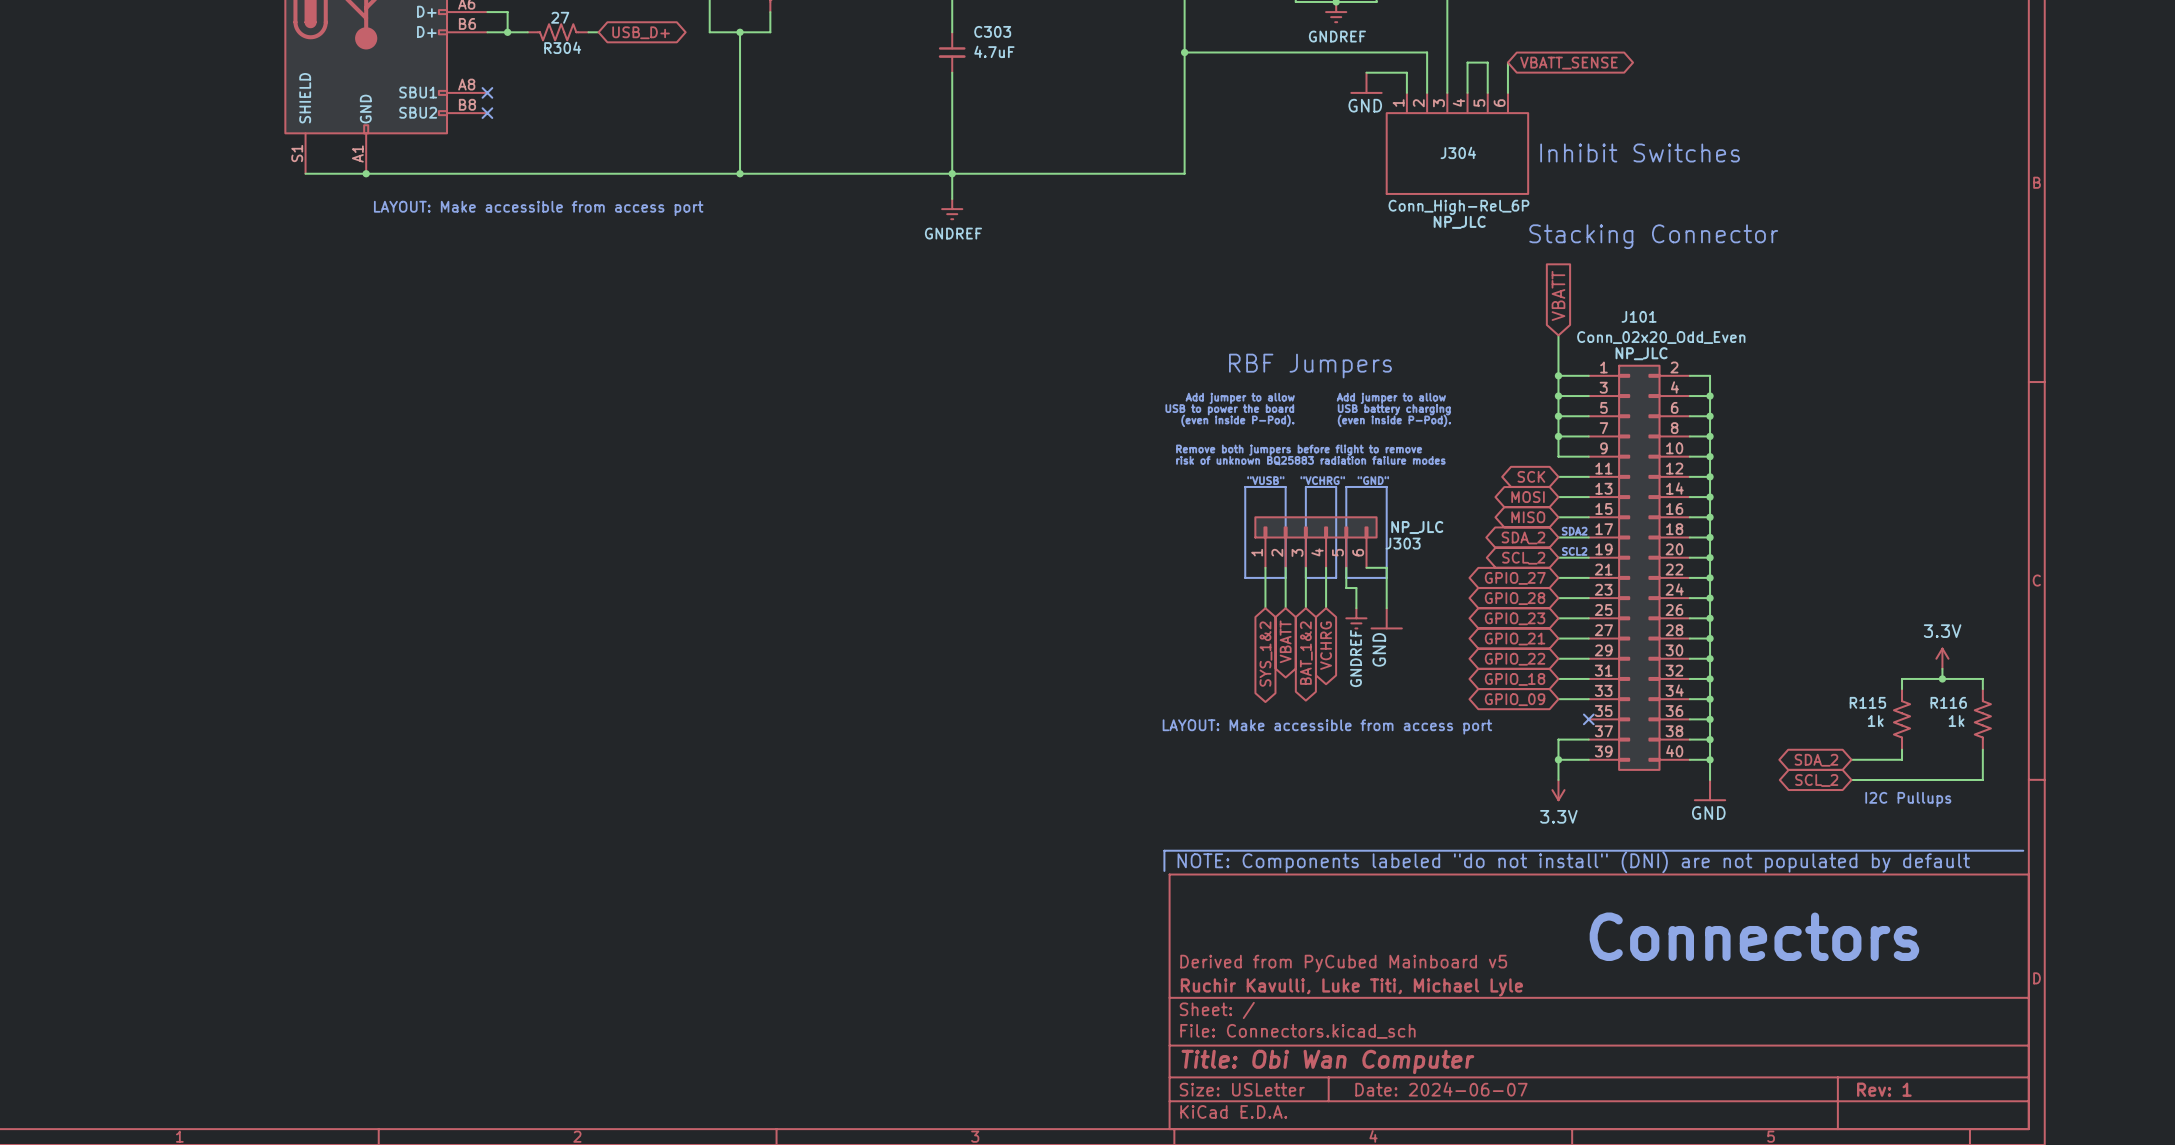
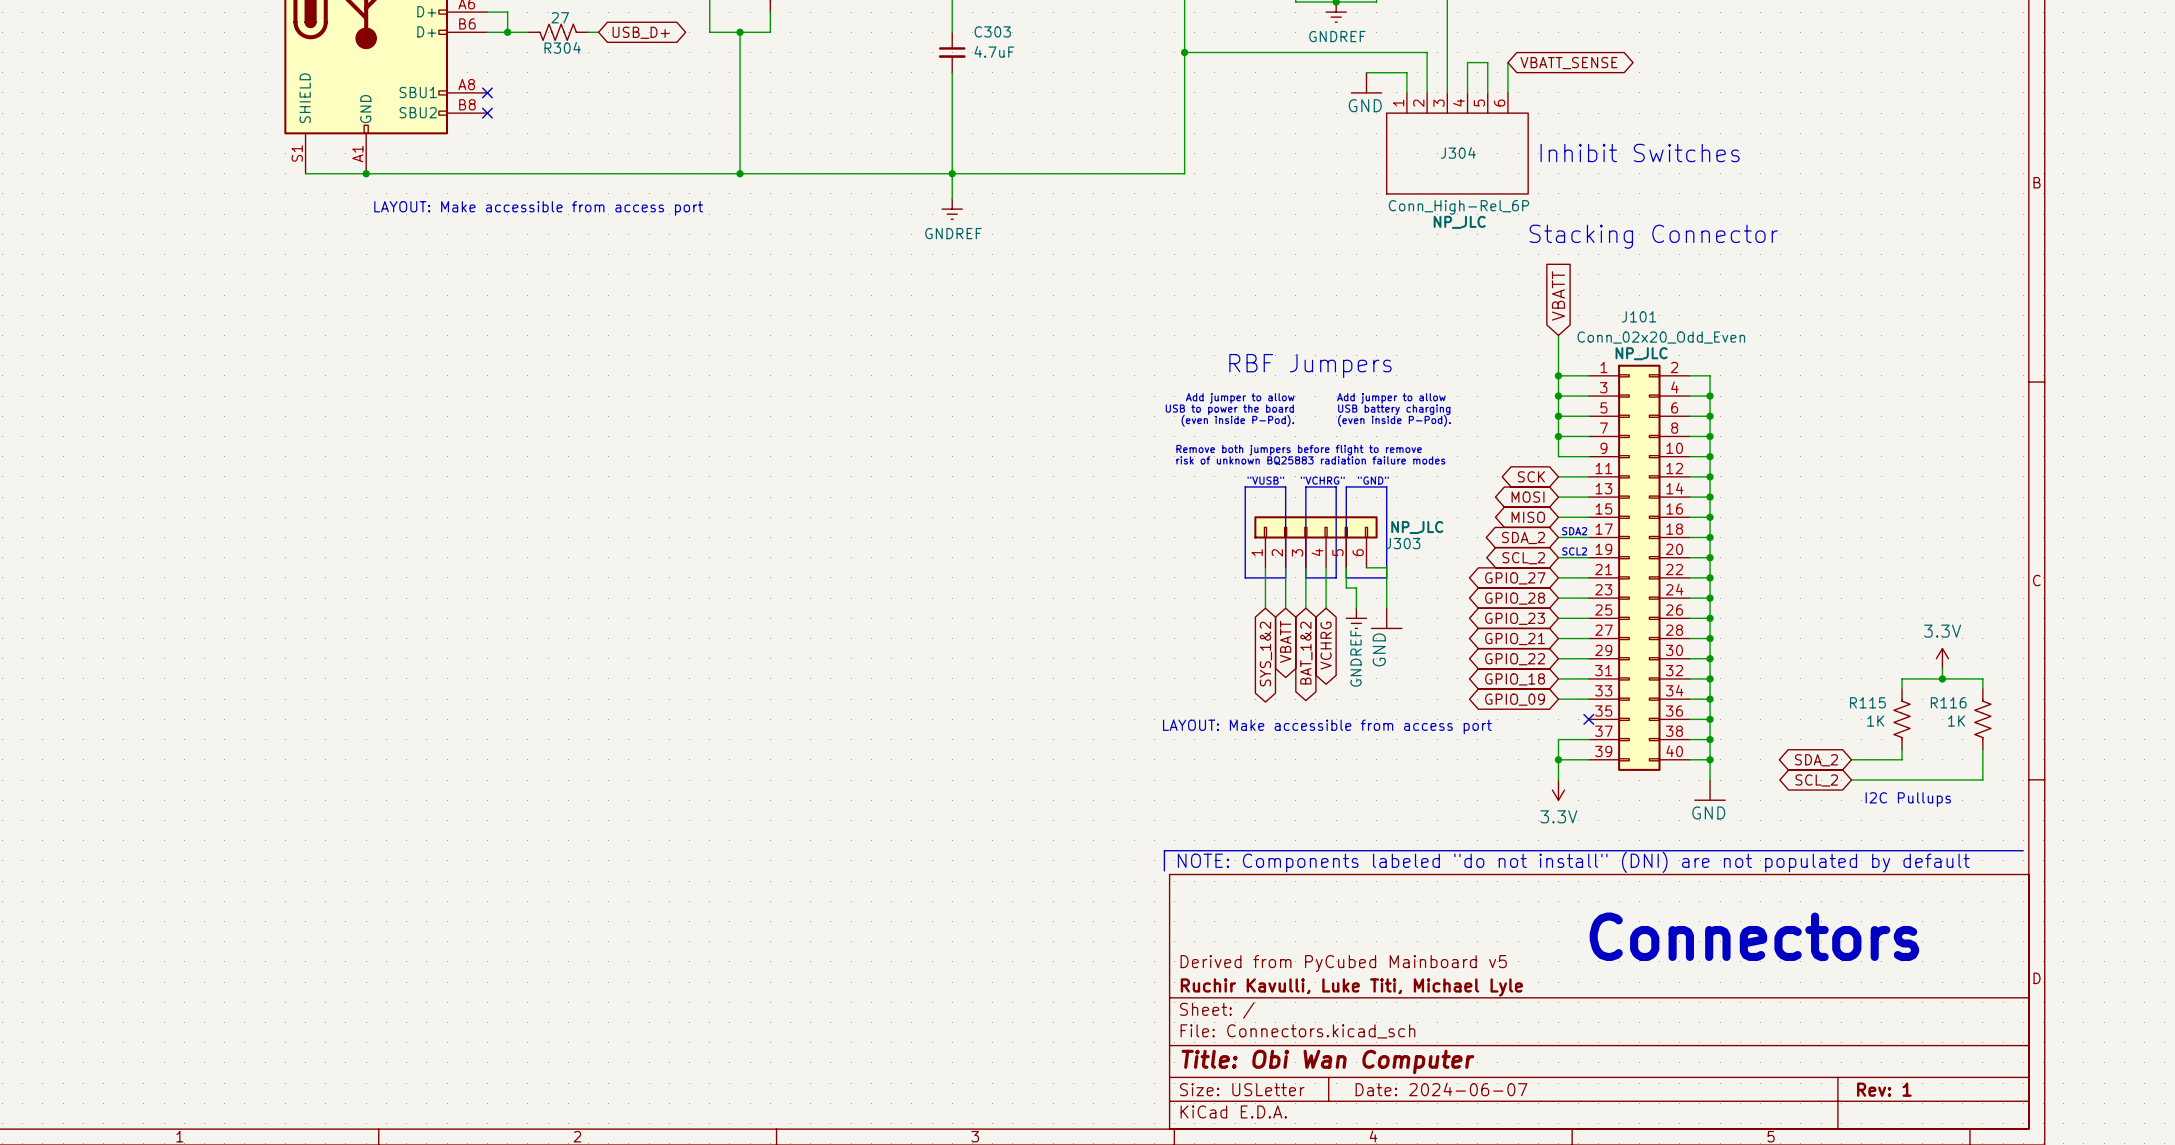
R115 value: 1k (1875, 721) -> 1K (1875, 721)
R116 value: 1k (1956, 721) -> 1K (1956, 721)

